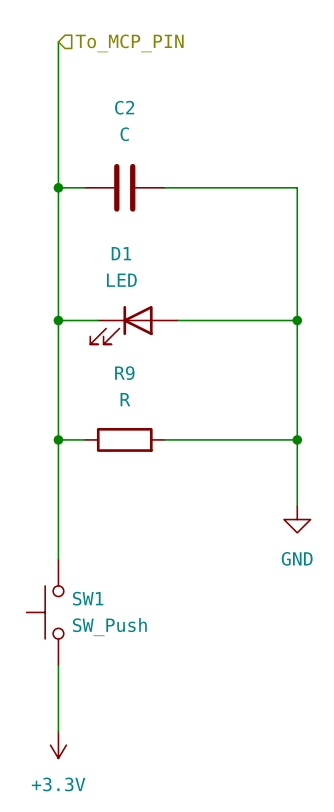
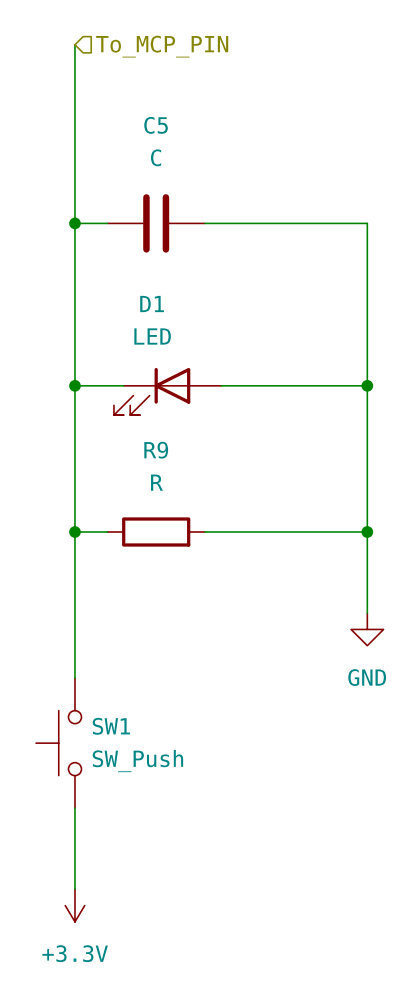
C2 name: C2 (124, 107) -> C5 (156, 125)

